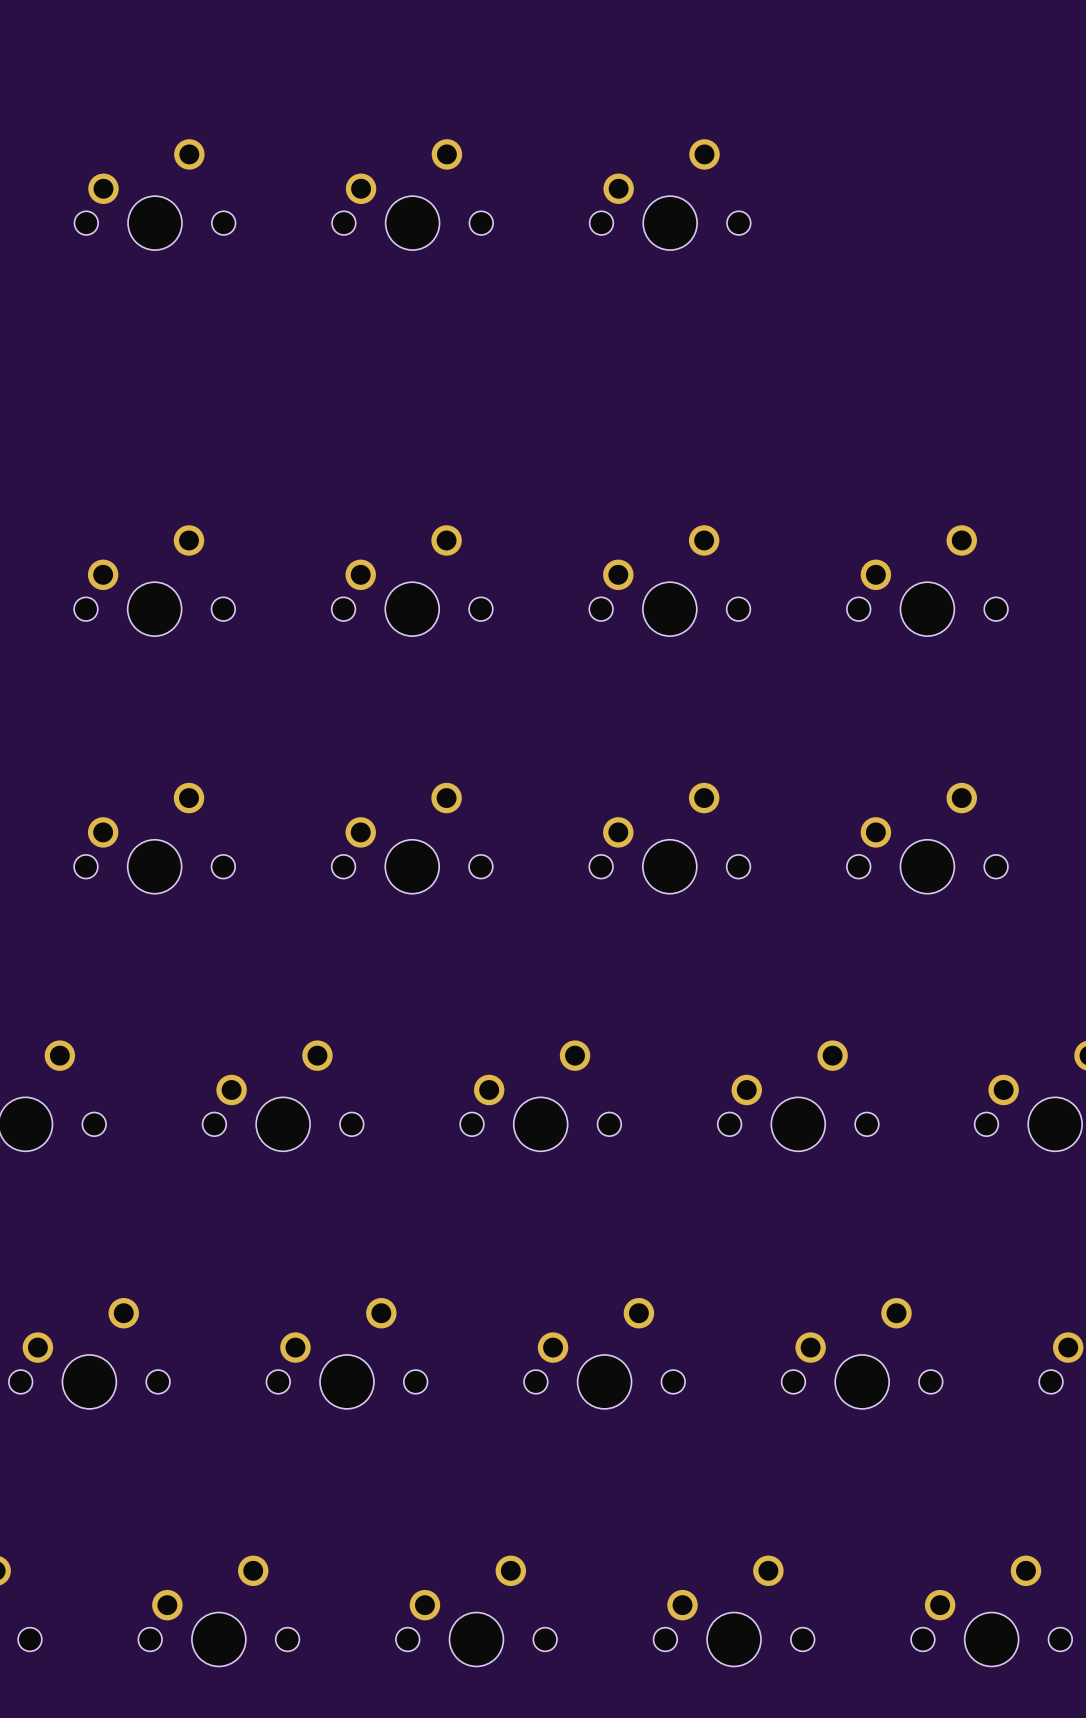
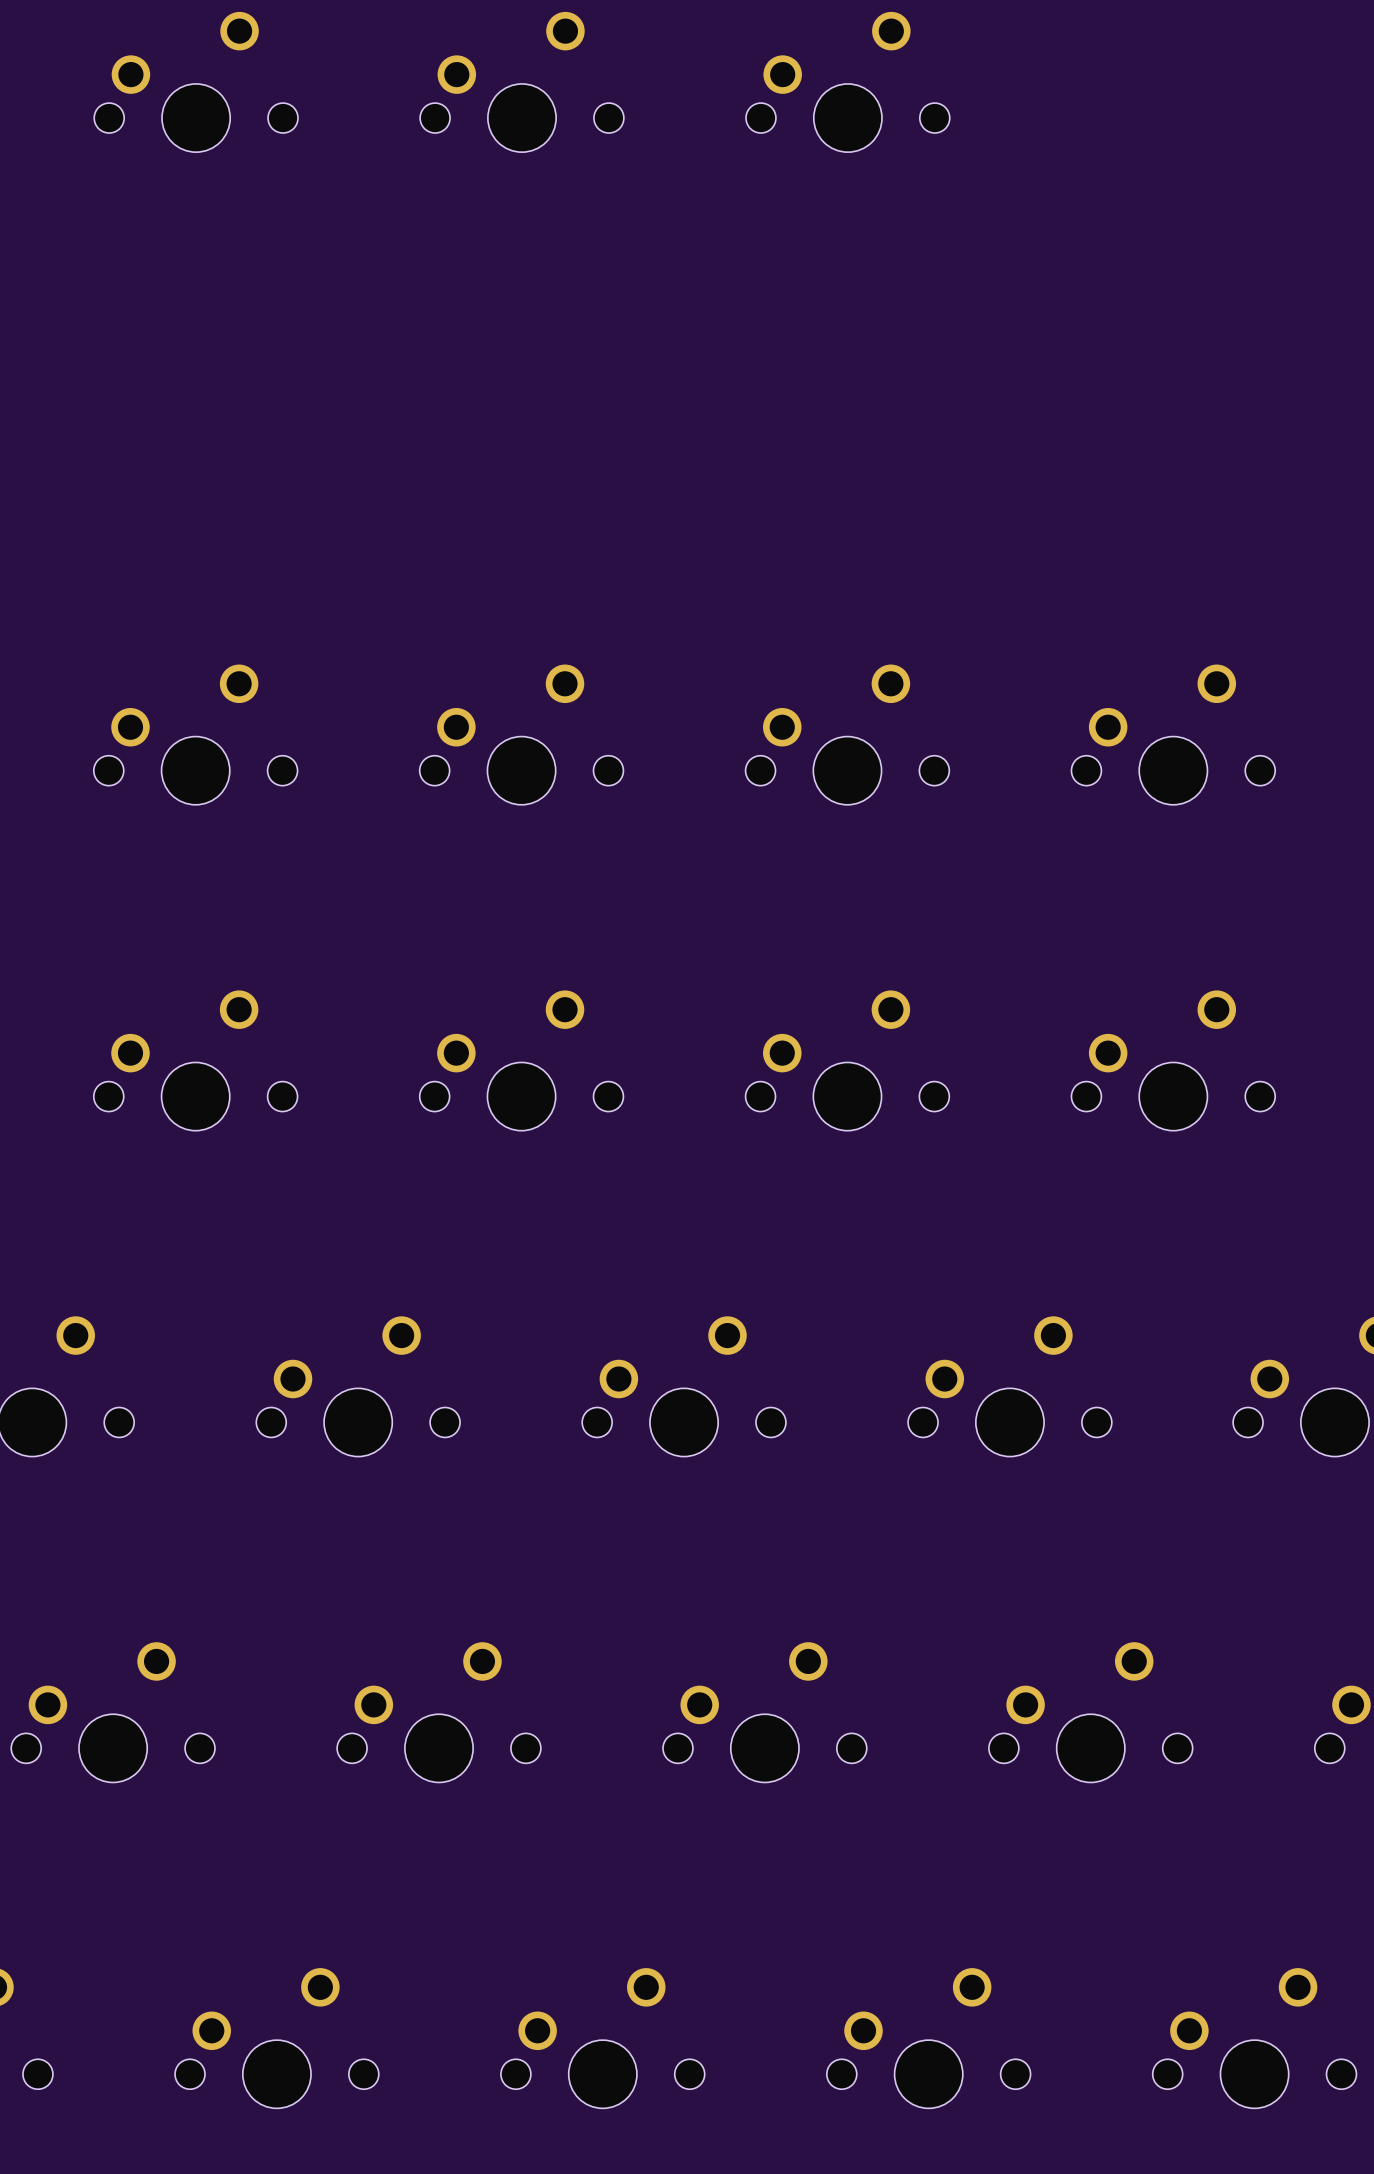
part position: (155, 194) -> (196, 82)
part position: (412, 194) -> (521, 82)
part position: (670, 194) -> (847, 82)

